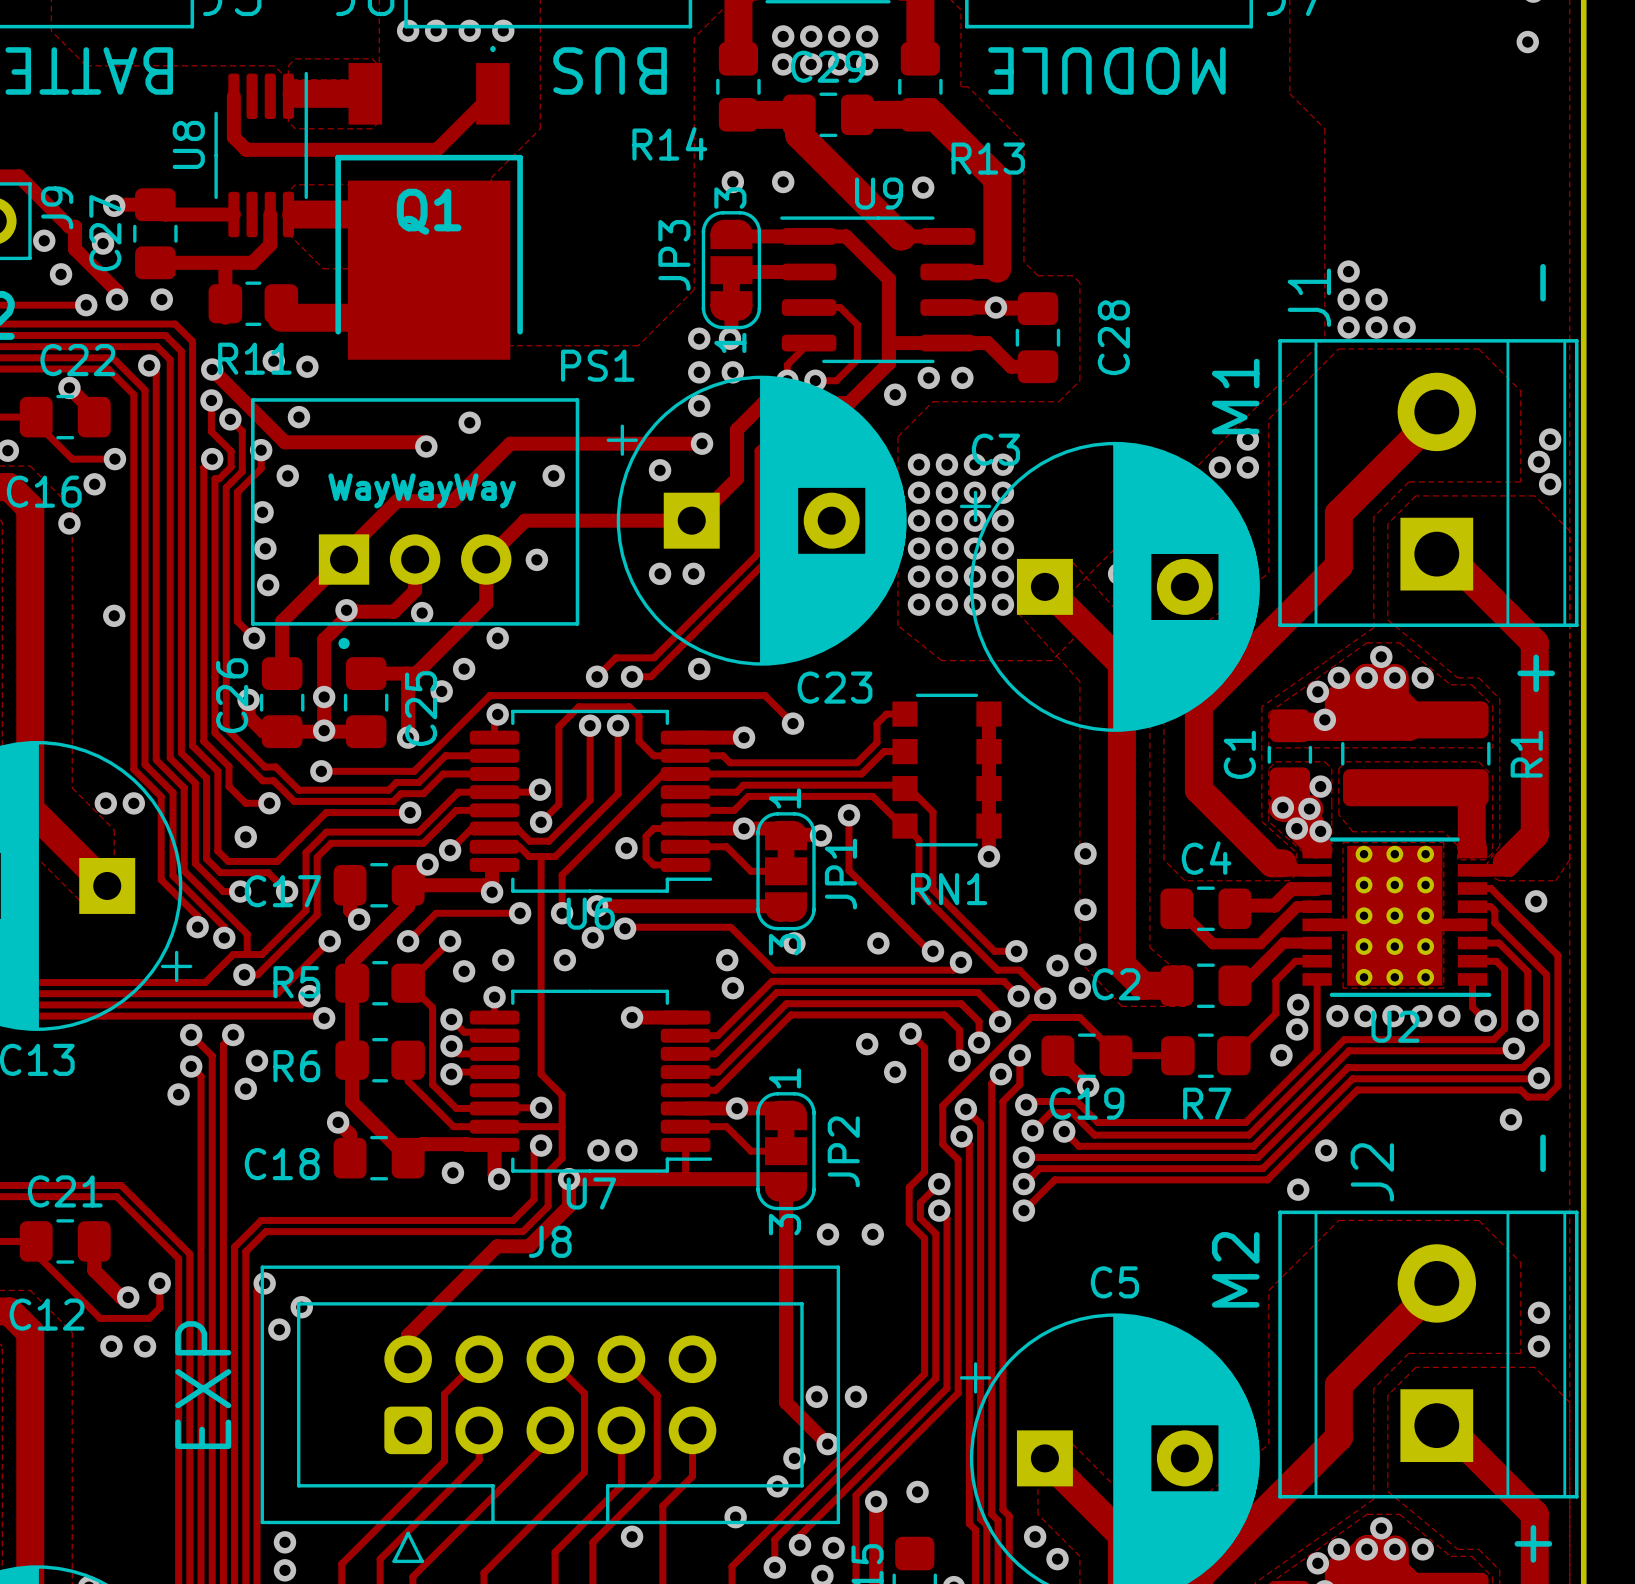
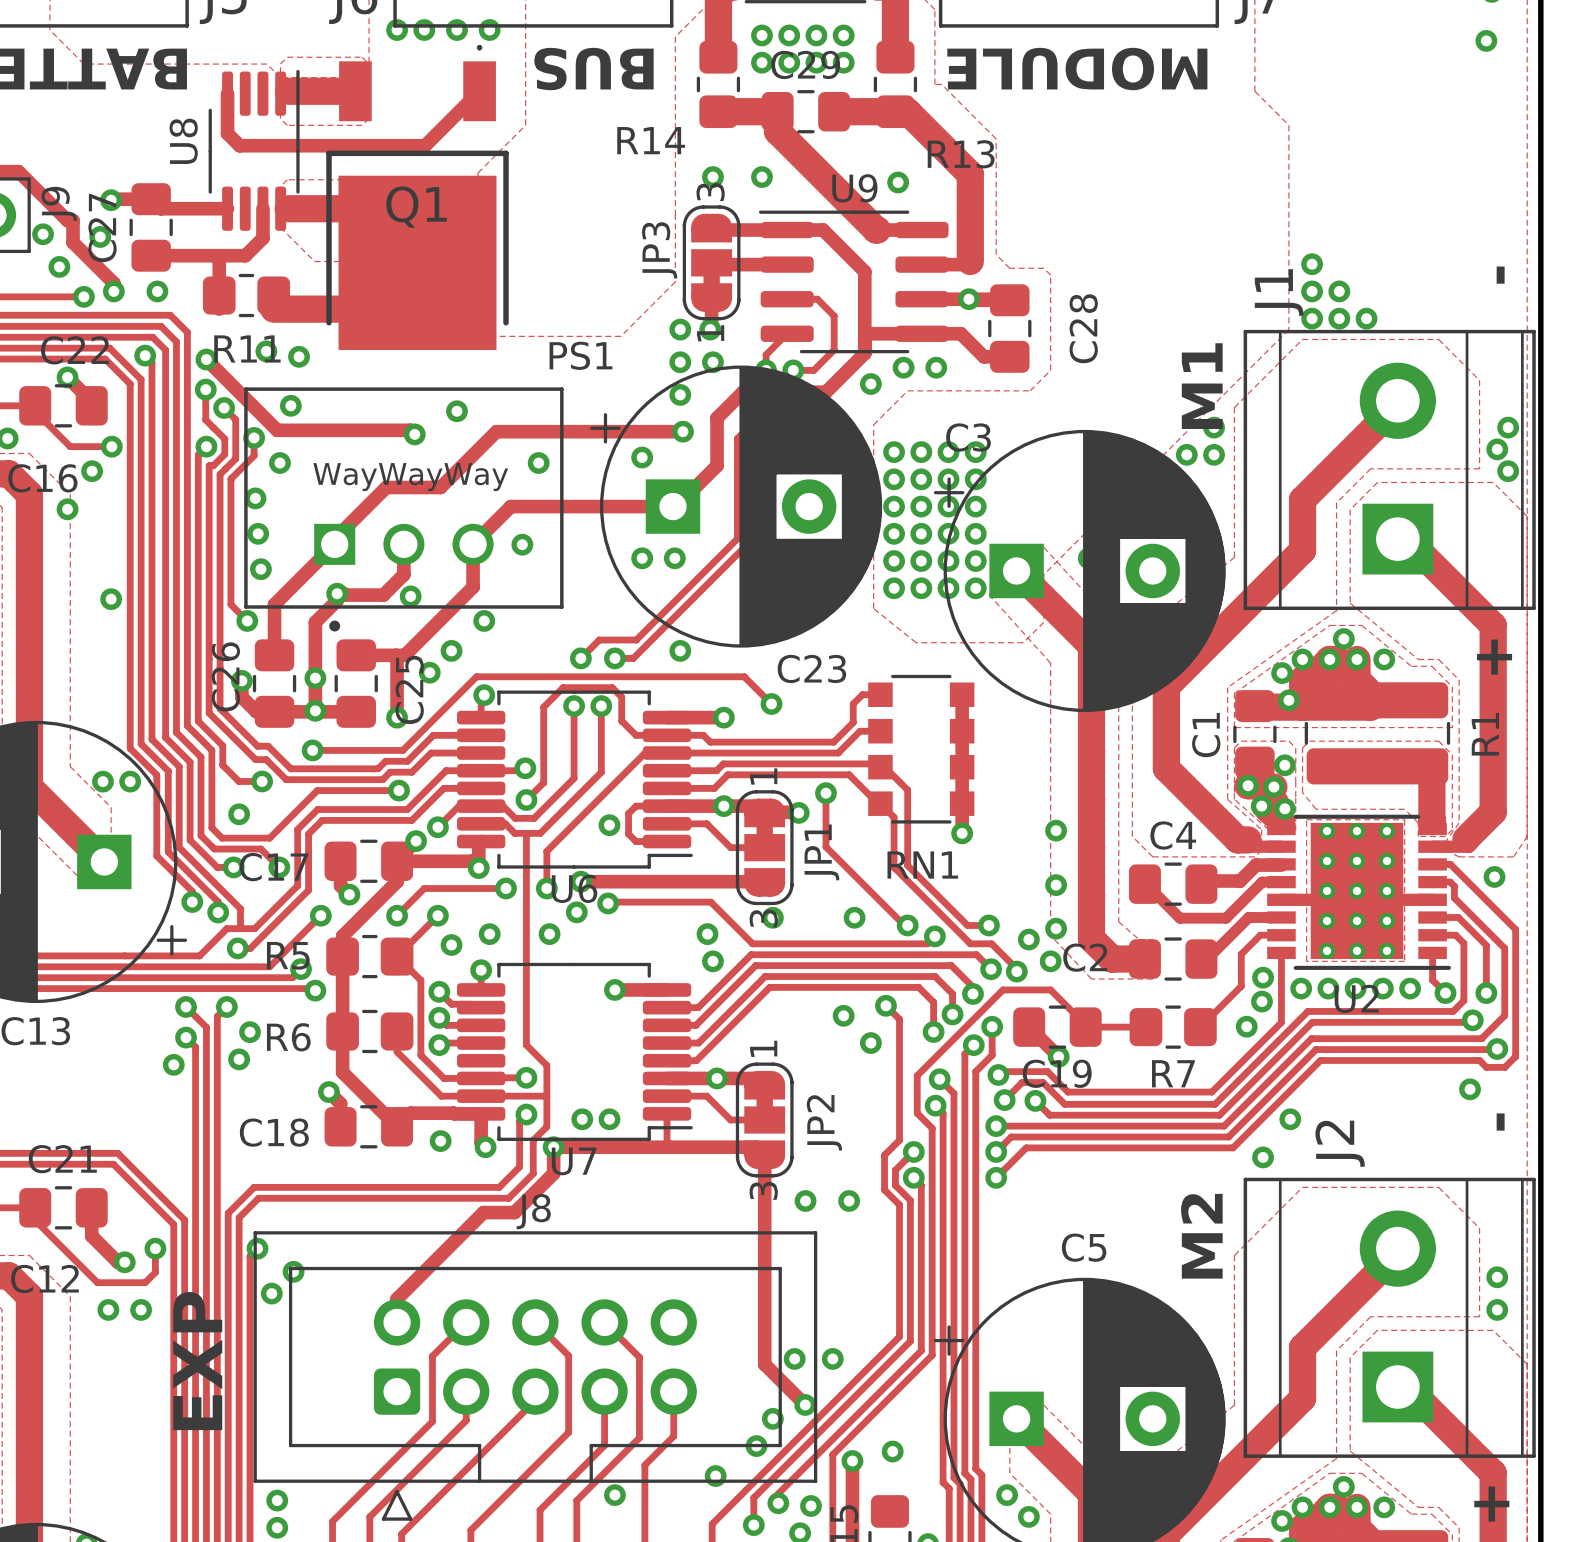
PS1 footprint: [251, 398, 580, 650] -> [244, 387, 564, 632]

